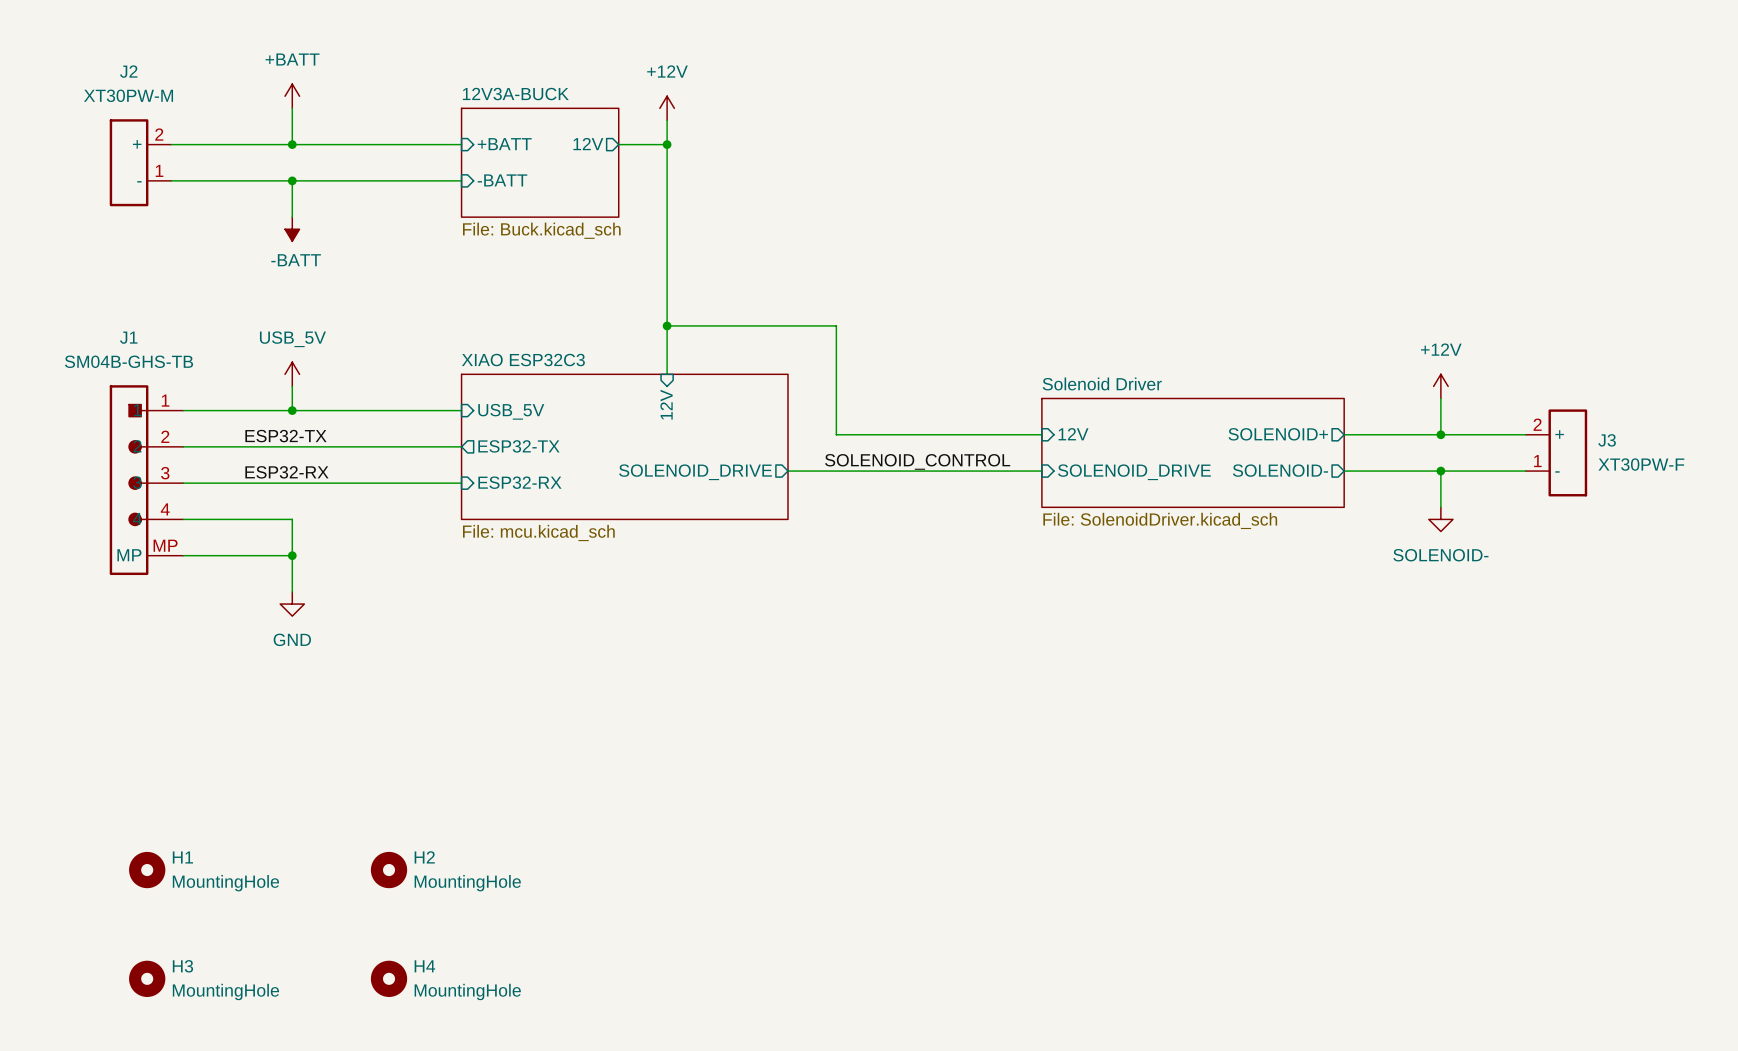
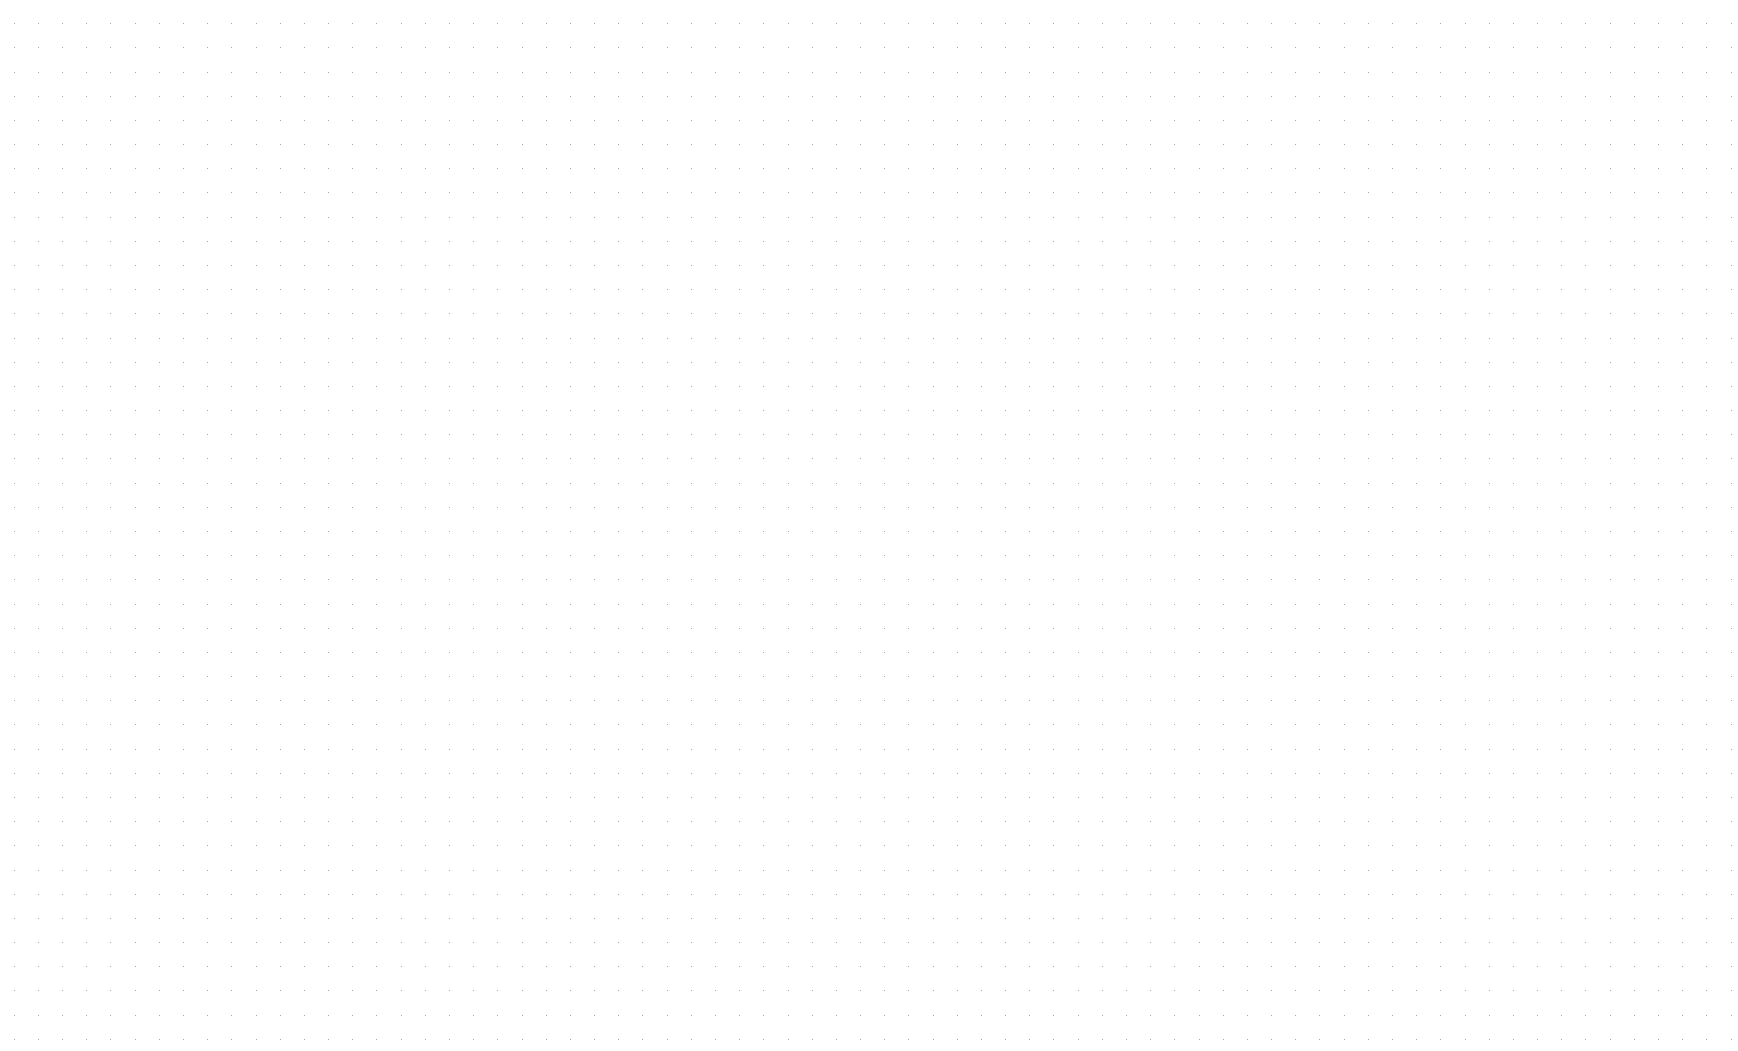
power symbol: +BATT (292, 96) -> none
wire: (292, 108) (292, 144) -> none
power symbol: +12V (667, 108) -> none
wire: (667, 120) (667, 374) -> none
wire: (171, 144) (461, 144) -> none
junction: (292, 144) -> none
sheet pin: +BATT (504, 144) -> none
sheet pin: 12V (588, 144) -> none
wire: (618, 144) (667, 144) -> none
junction: (667, 144) -> none
J2: XT30PW-M (140, 162) -> none
sheet 12V3A-BUCK: File: Buck.kicad_sch (540, 162) -> none
wire: (171, 180) (461, 180) -> none
wire: (292, 180) (292, 217) -> none
junction: (292, 180) -> none
sheet pin: -BATT (502, 180) -> none
power symbol: -BATT (292, 229) -> none
wire: (667, 325) (836, 325) (836, 434) (1041, 434) -> none
junction: (667, 325) -> none
power symbol: USB_5V (292, 374) -> none
wire: (292, 386) (292, 410) -> none
power symbol: +12V (1440, 386) -> none
wire: (1440, 398) (1440, 434) -> none
sheet pin: 12V (666, 404) -> none
wire: (183, 410) (461, 410) -> none
junction: (292, 410) -> none
sheet pin: USB_5V (511, 411) -> none
sheet pin: 12V (1073, 434) -> none
sheet pin: SOLENOID+ (1278, 434) -> none
wire: (1344, 434) (1525, 434) -> none
junction: (1440, 434) -> none
label: ESP32-TX (285, 436) -> none
wire: (183, 446) (461, 446) -> none
sheet pin: ESP32-TX (518, 446) -> none
sheet XIAO ESP32C3: File: mcu.kicad_sch (624, 446) -> none
sheet Solenoid Driver: File: SolenoidDriver.kicad_sch (1193, 452) -> none
J3: XT30PW-F (1556, 452) -> none
label: SOLENOID_CONTROL (917, 461) -> none
sheet pin: SOLENOID- (1280, 470) -> none
wire: (788, 471) (1041, 471) -> none
wire: (1344, 471) (1525, 471) -> none
wire: (1440, 471) (1440, 507) -> none
junction: (1440, 471) -> none
label: ESP32-RX (286, 472) -> none
sheet pin: SOLENOID_DRIVE (695, 472) -> none
sheet pin: SOLENOID_DRIVE (1134, 472) -> none
J1: SM04B-GHS-TB (146, 480) -> none
sheet pin: ESP32-RX (519, 482) -> none
wire: (183, 483) (461, 483) -> none
wire: (183, 519) (292, 519) (292, 591) -> none
power symbol: SOLENOID- (1440, 519) -> none
wire: (183, 555) (292, 555) -> none
junction: (292, 555) -> none
power symbol: GND (292, 604) -> none
H1: MountingHole (147, 870) -> none
H2: MountingHole (389, 870) -> none
H3: MountingHole (147, 978) -> none
H4: MountingHole (389, 978) -> none

